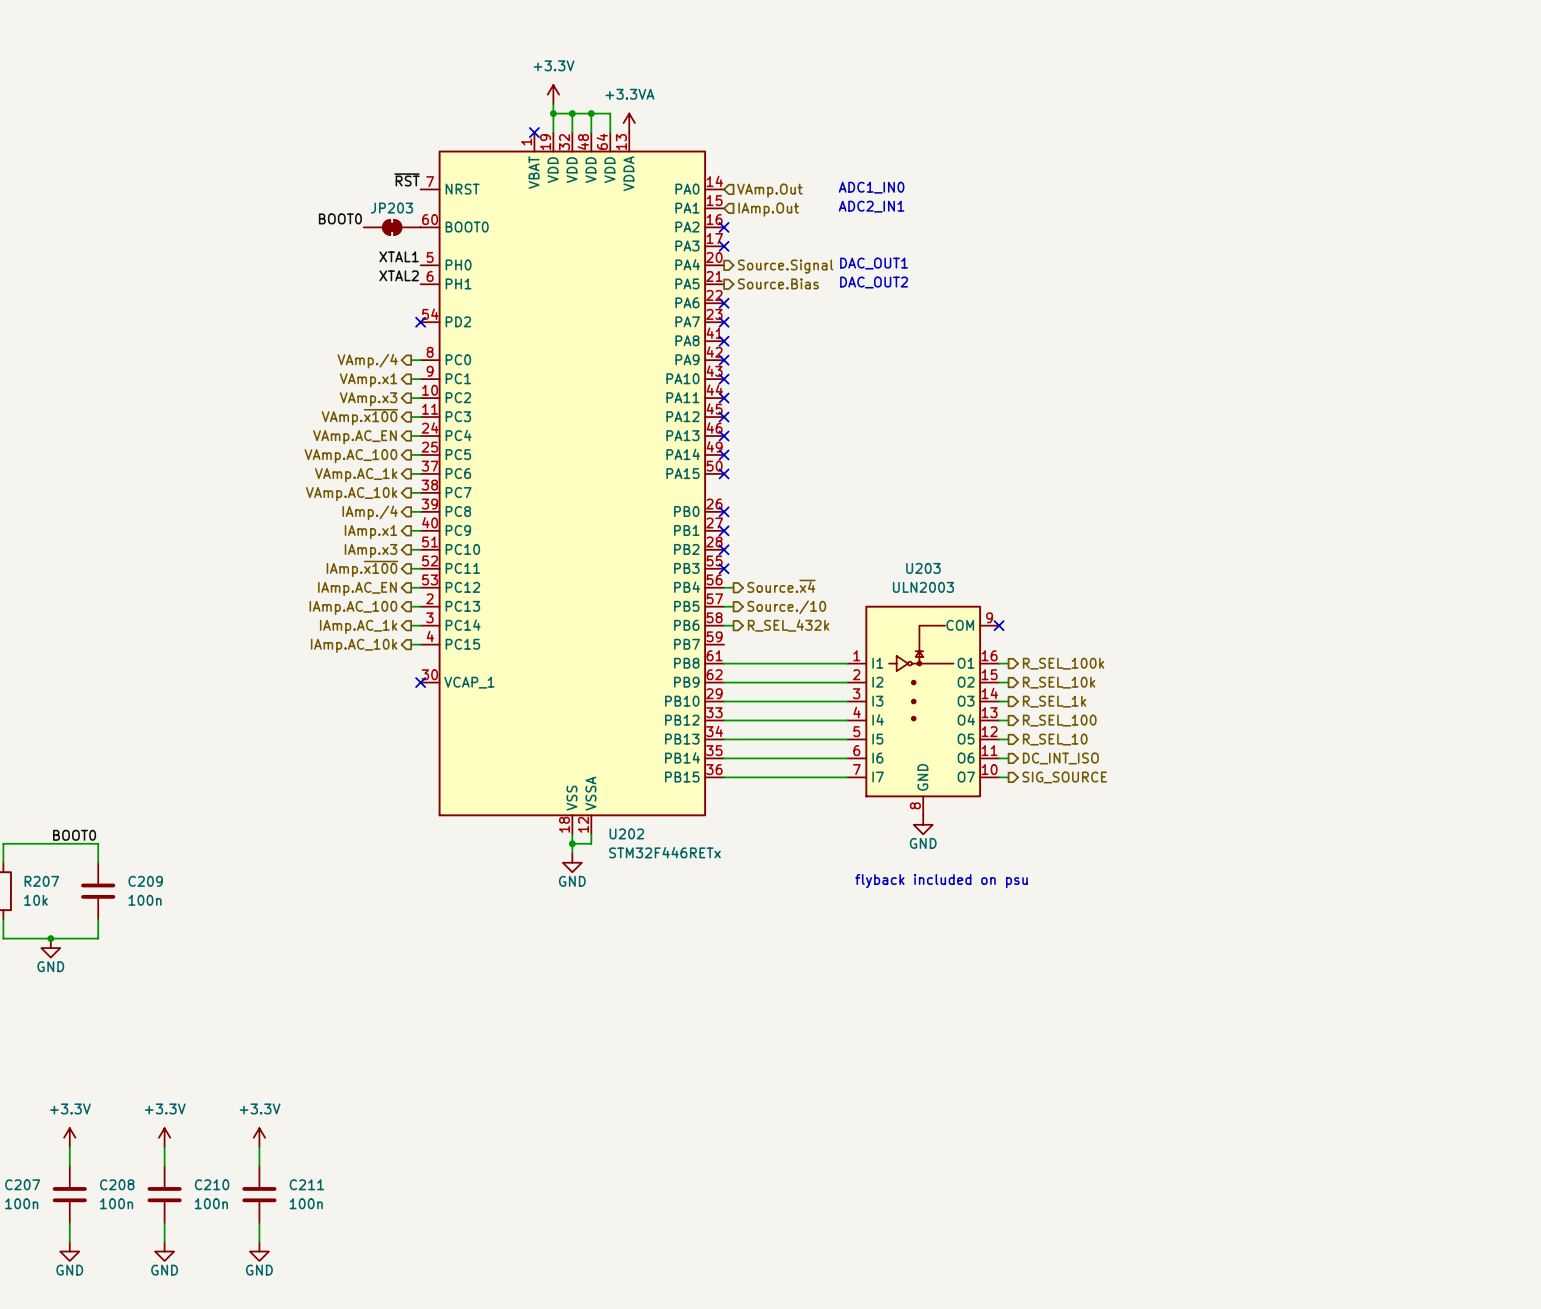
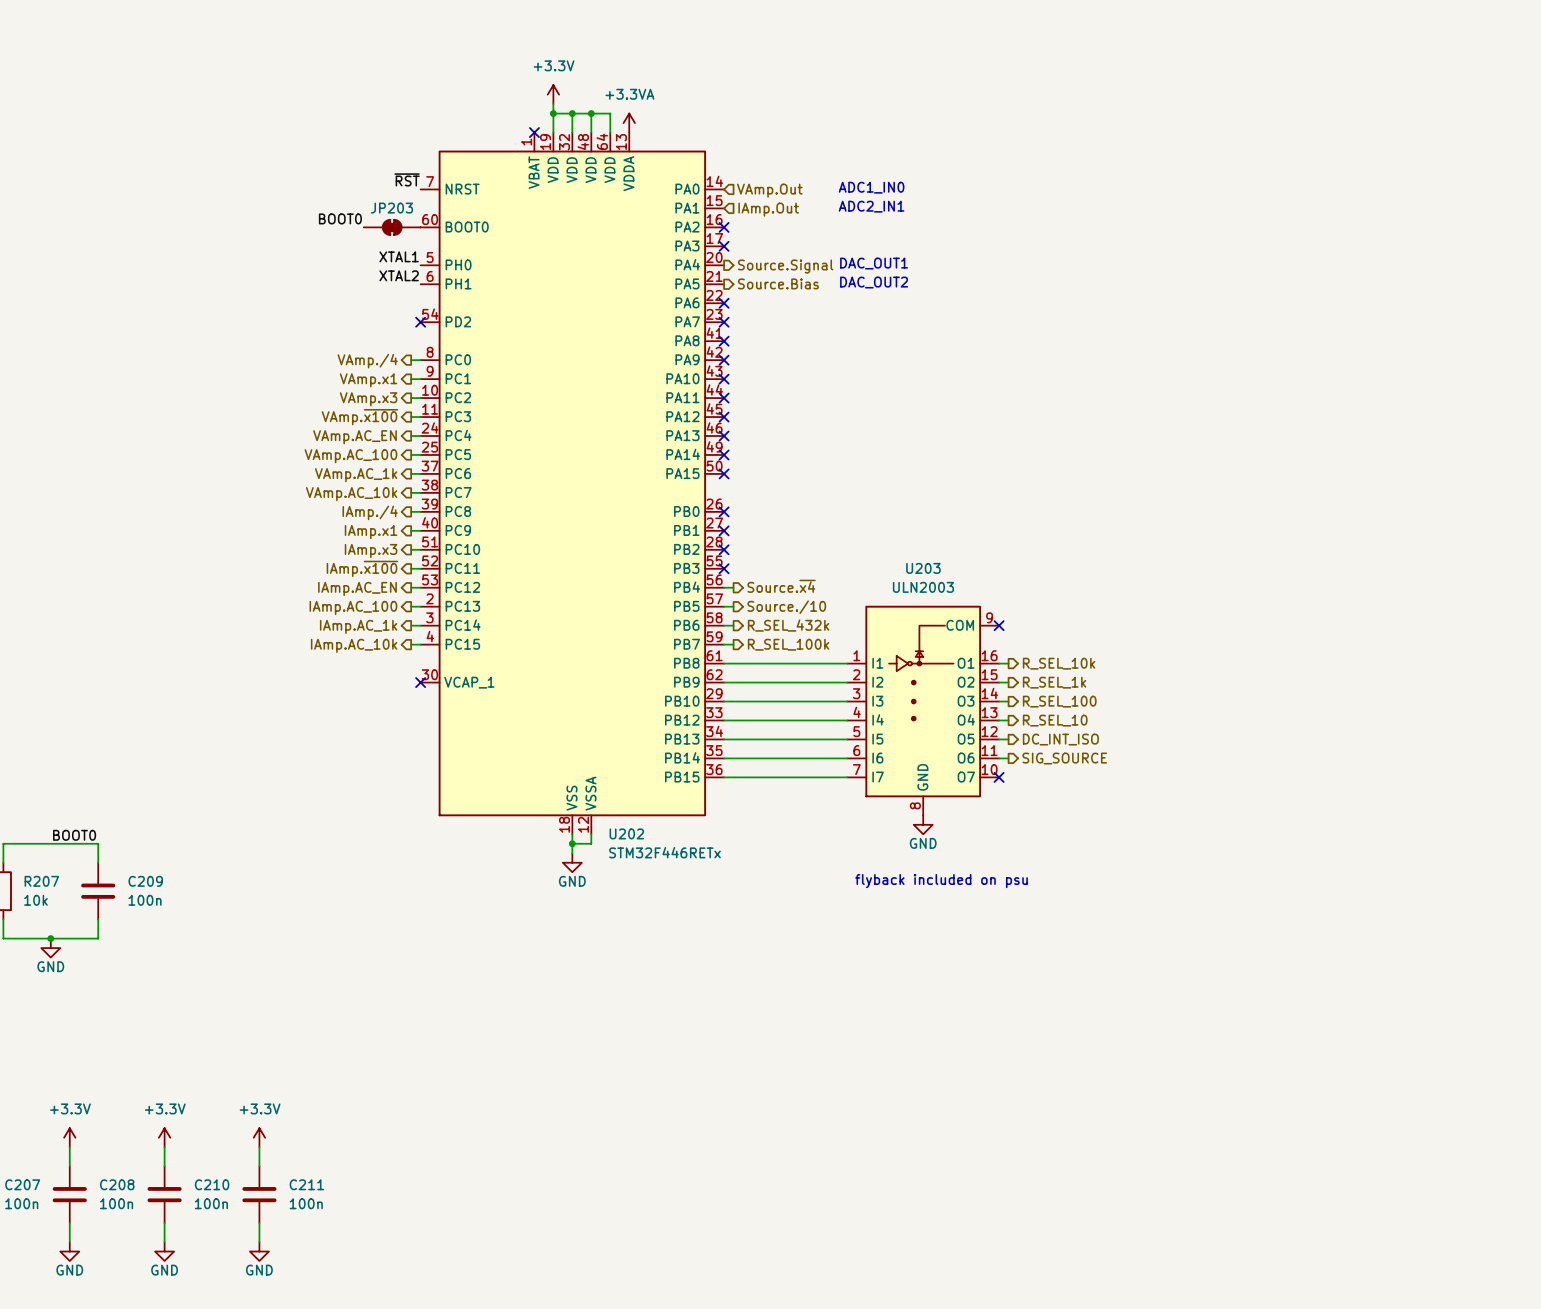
wire: none -> (724, 644) (733, 644)
hierarchical label: none -> R_SEL_100k (788, 644)
hierarchical label: R_SEL_100k (1063, 663) -> R_SEL_10k (1059, 663)
hierarchical label: R_SEL_10k (1059, 682) -> R_SEL_1k (1054, 682)
hierarchical label: R_SEL_1k (1054, 701) -> R_SEL_100 (1059, 701)
hierarchical label: R_SEL_100 (1059, 720) -> R_SEL_10 (1055, 720)
hierarchical label: R_SEL_10 (1055, 739) -> DC_INT_ISO (1060, 739)
hierarchical label: DC_INT_ISO (1060, 758) -> SIG_SOURCE (1064, 758)
wire: (999, 777) (1008, 777) -> none
no-connect mark: none -> (999, 777)
hierarchical label: SIG_SOURCE (1064, 777) -> none

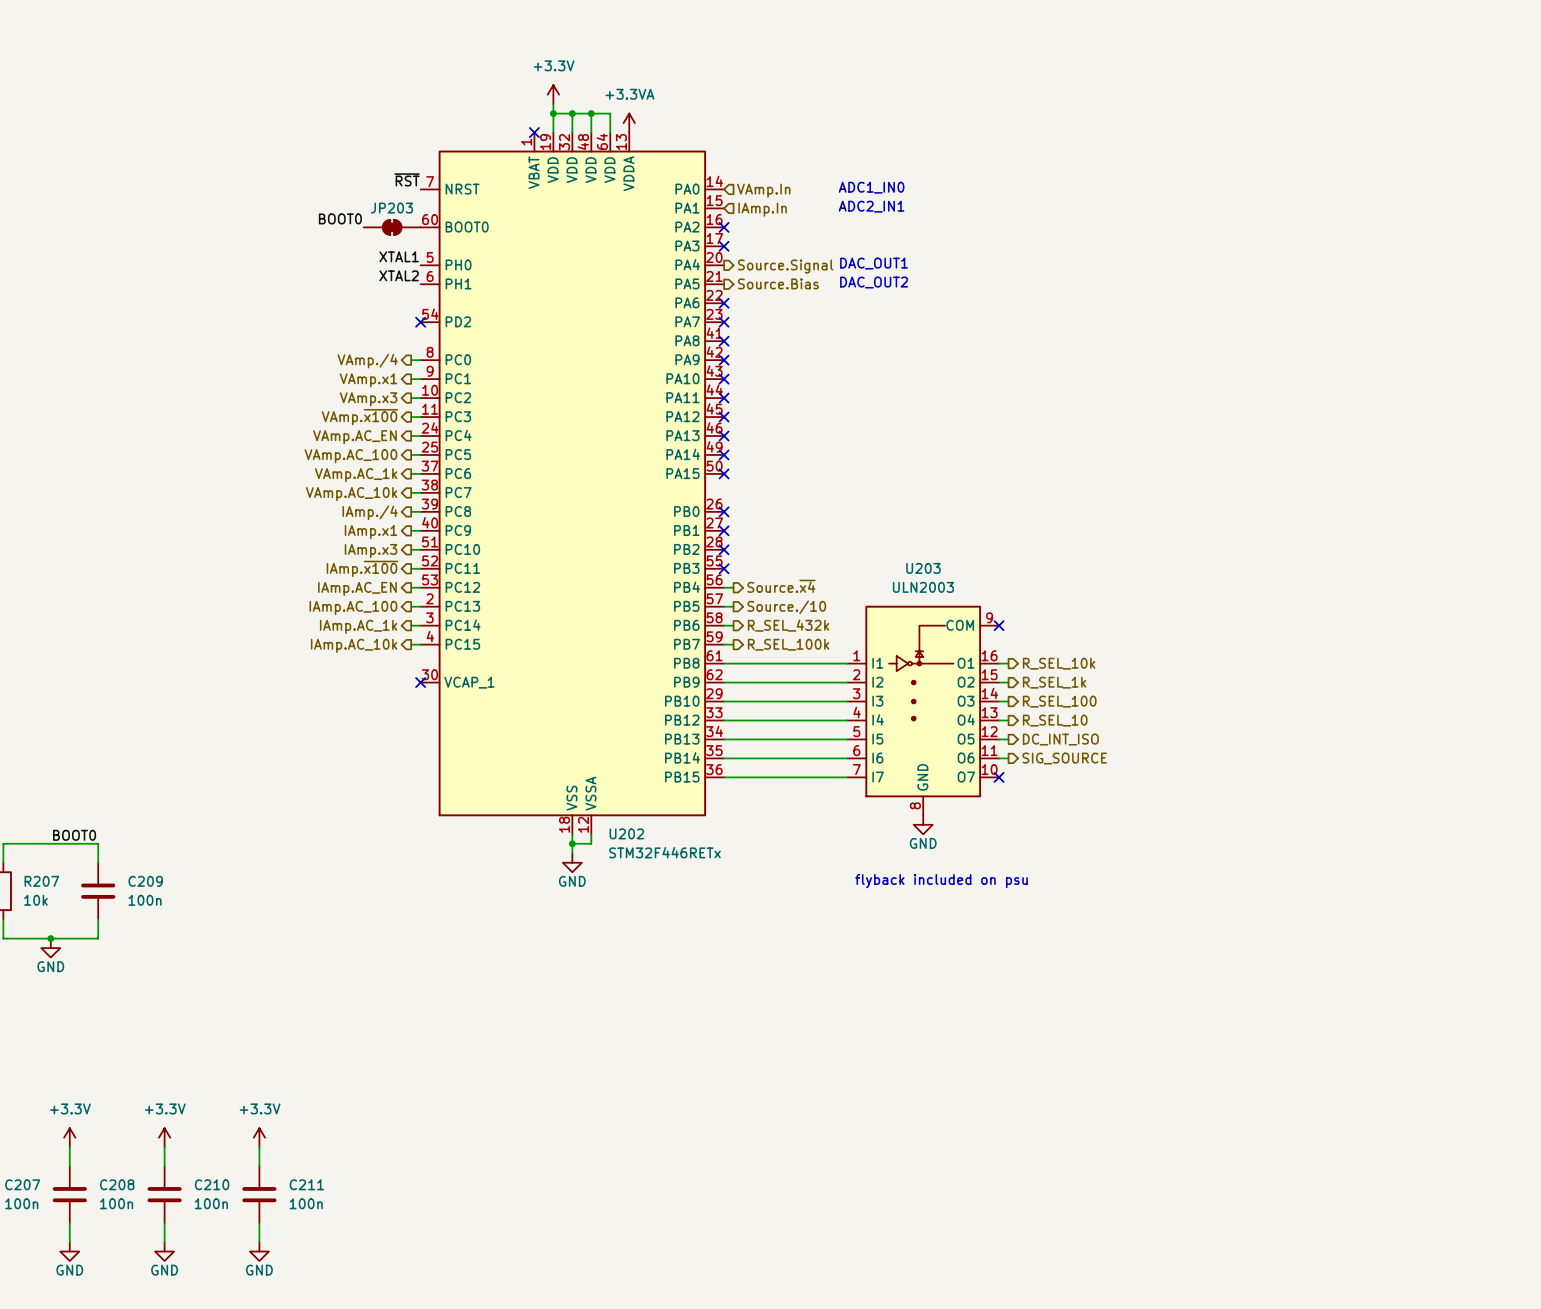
hierarchical label: VAmp.Out (769, 190) -> VAmp.In (763, 190)
hierarchical label: IAmp.Out (768, 209) -> IAmp.In (762, 209)

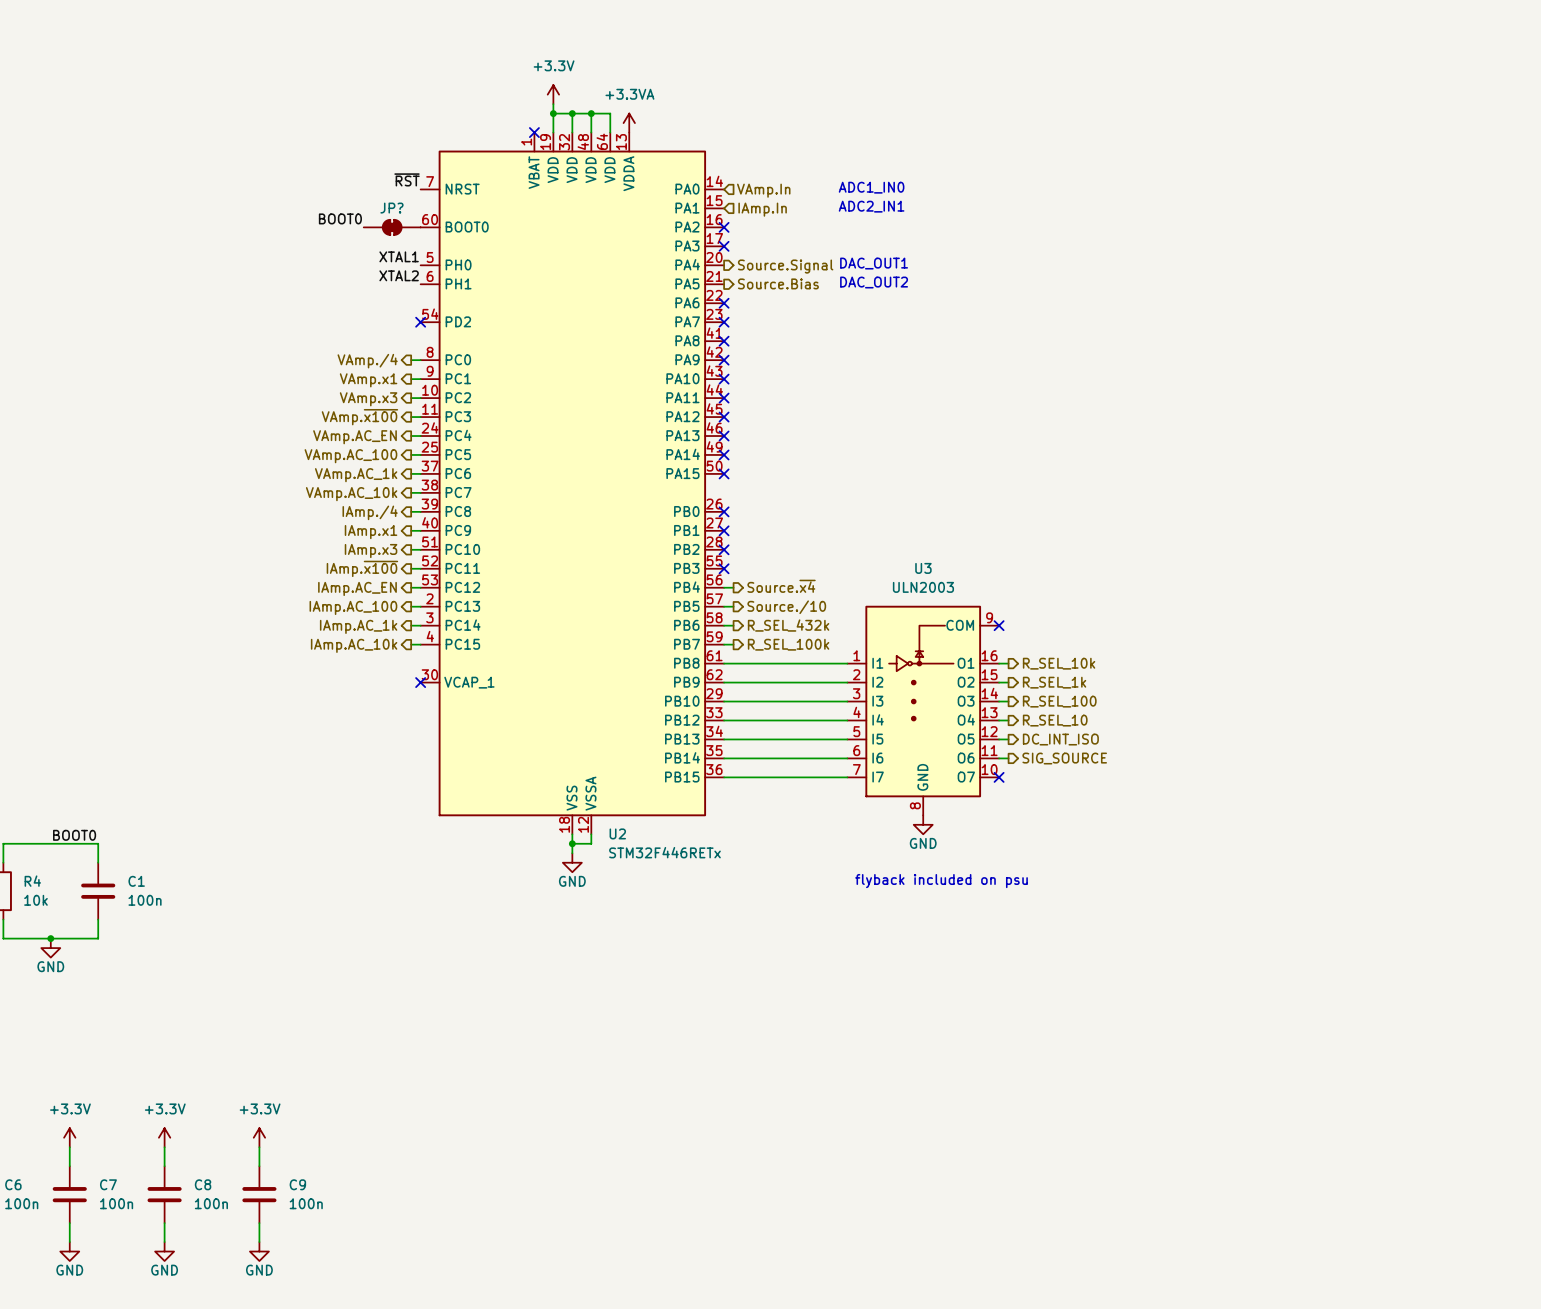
JP203 name: JP203 (391, 208) -> JP? (391, 208)
U203 name: U203 (923, 568) -> U3 (923, 568)
U202 name: U202 (626, 833) -> U2 (617, 833)
R207 name: R207 (41, 881) -> R4 (32, 881)
C209 name: C209 (145, 881) -> C1 (136, 881)
C207 name: C207 (22, 1184) -> C6 (13, 1184)
C208 name: C208 (117, 1184) -> C7 (108, 1184)
C210 name: C210 (212, 1184) -> C8 (203, 1184)
C211 name: C211 (306, 1184) -> C9 (297, 1184)

